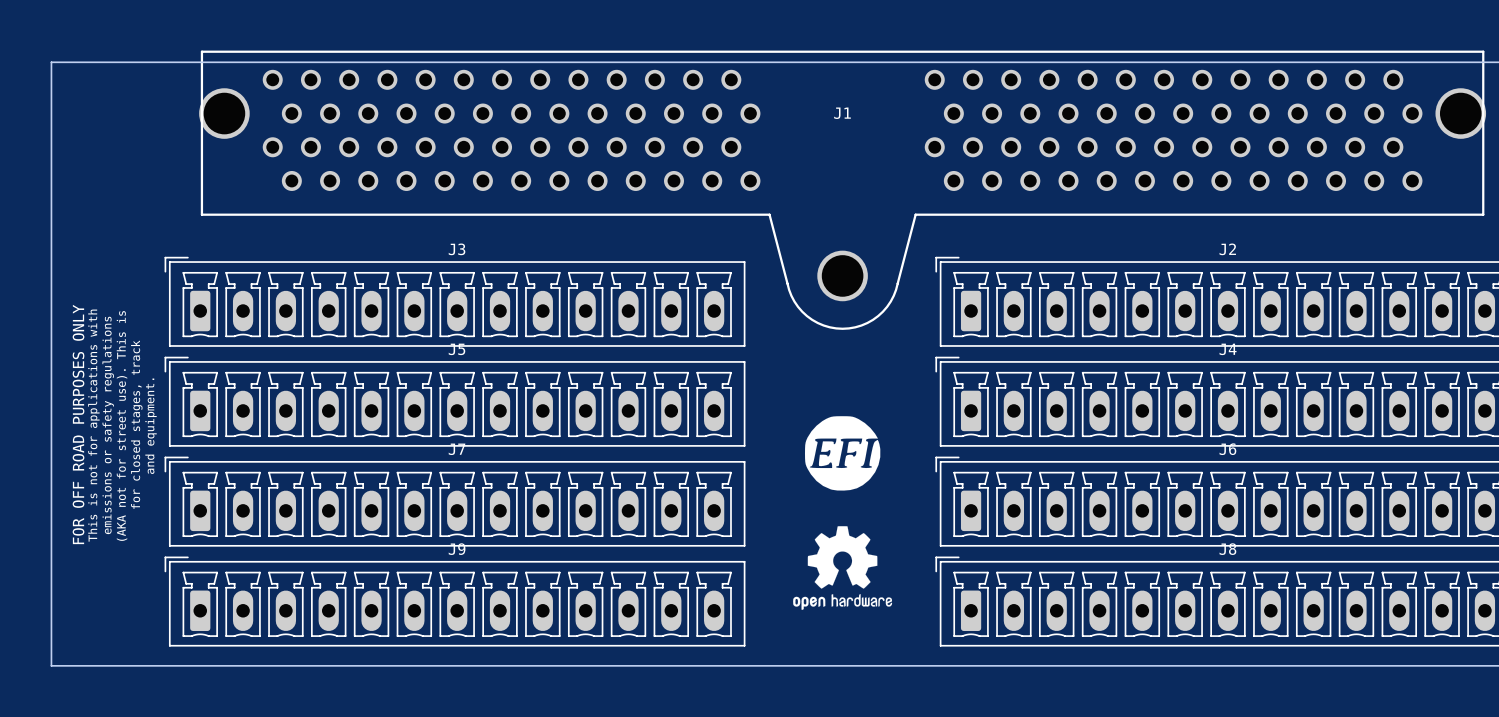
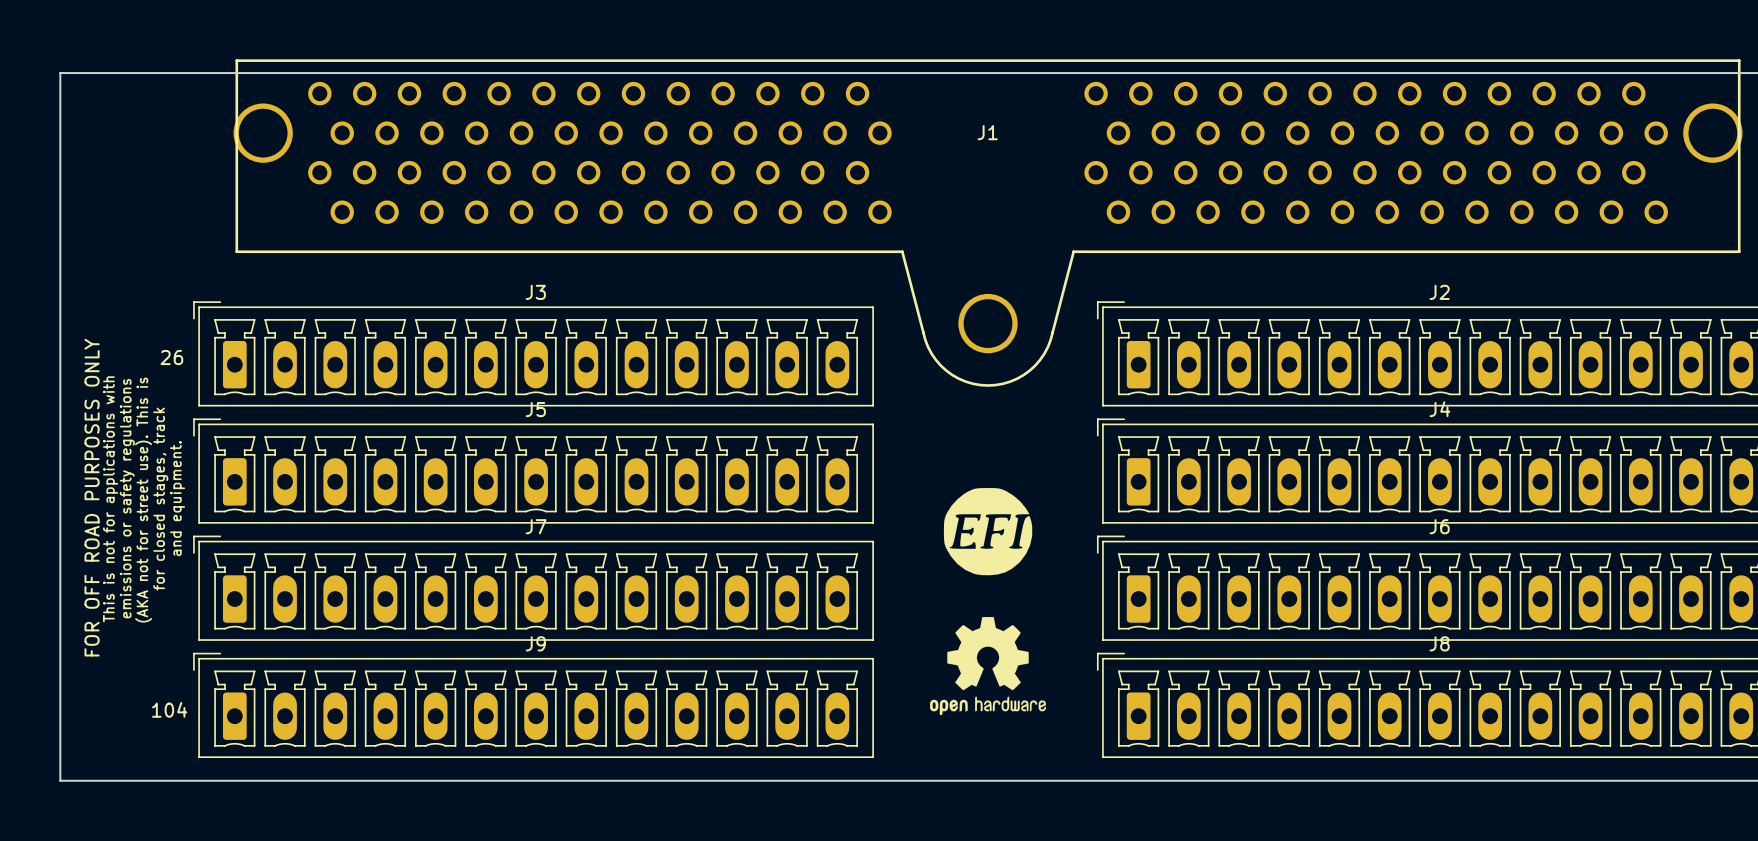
text: none -> 26 (171, 357)
text: none -> 104 (169, 709)

